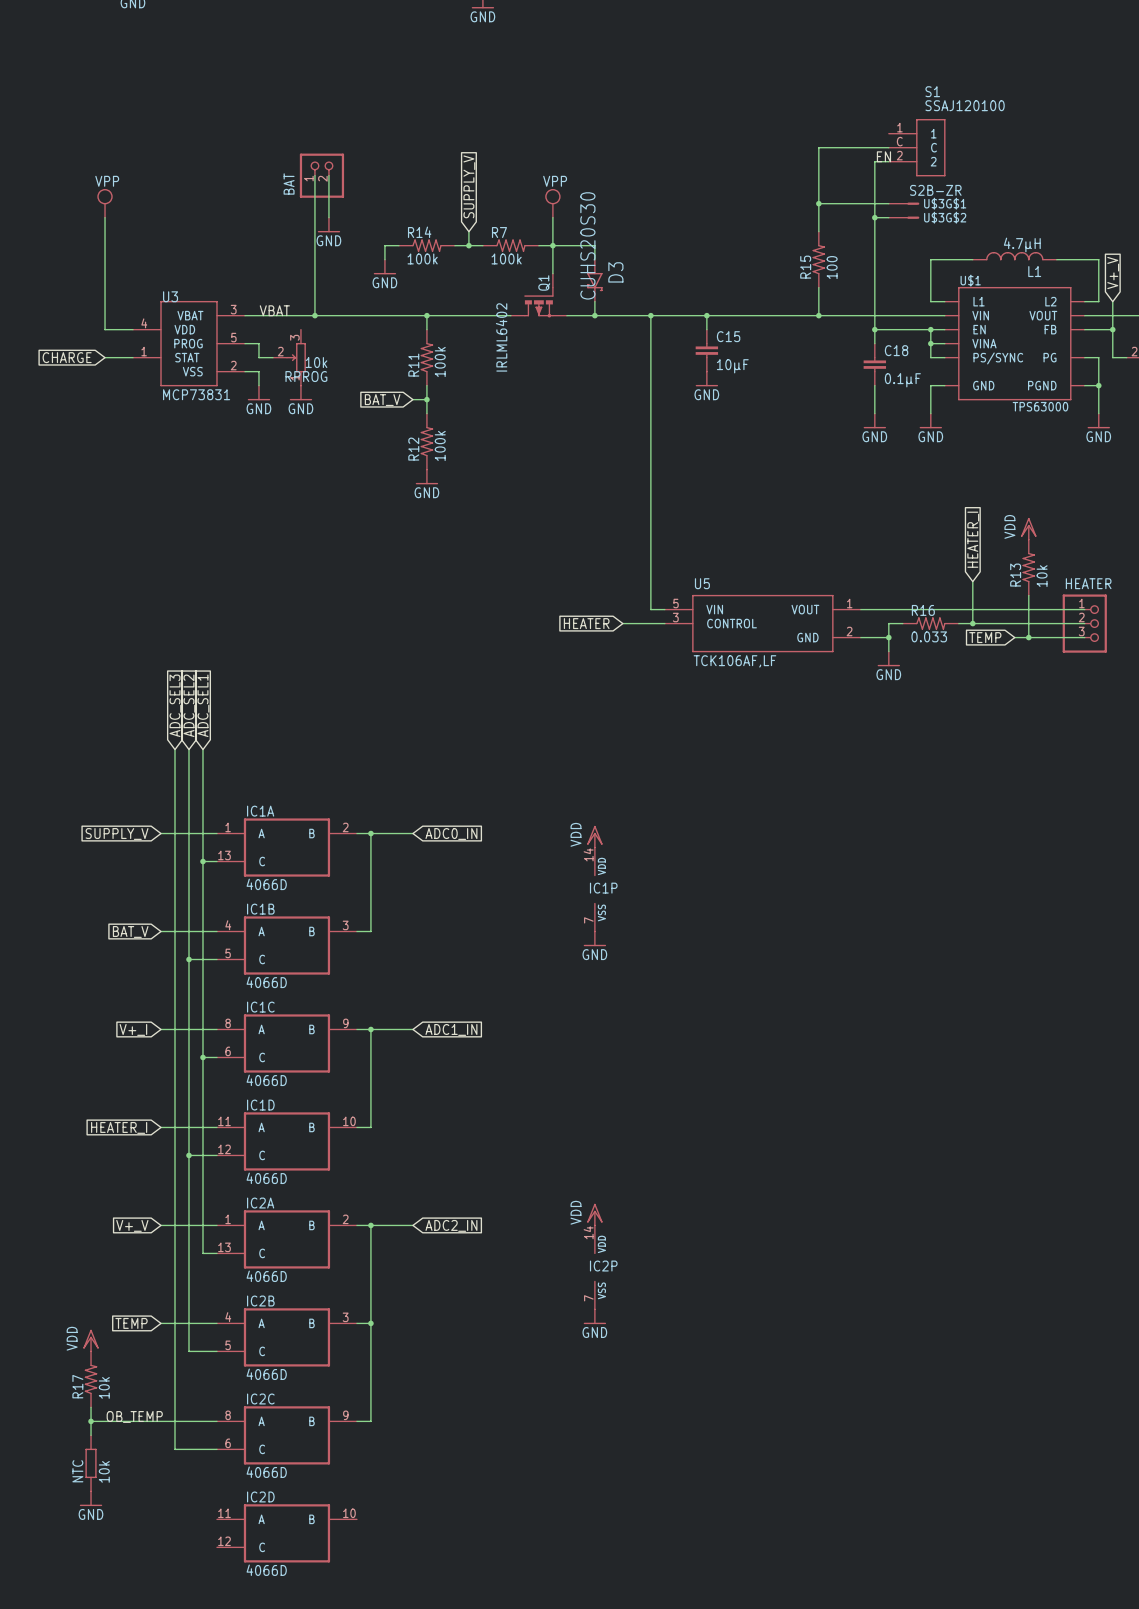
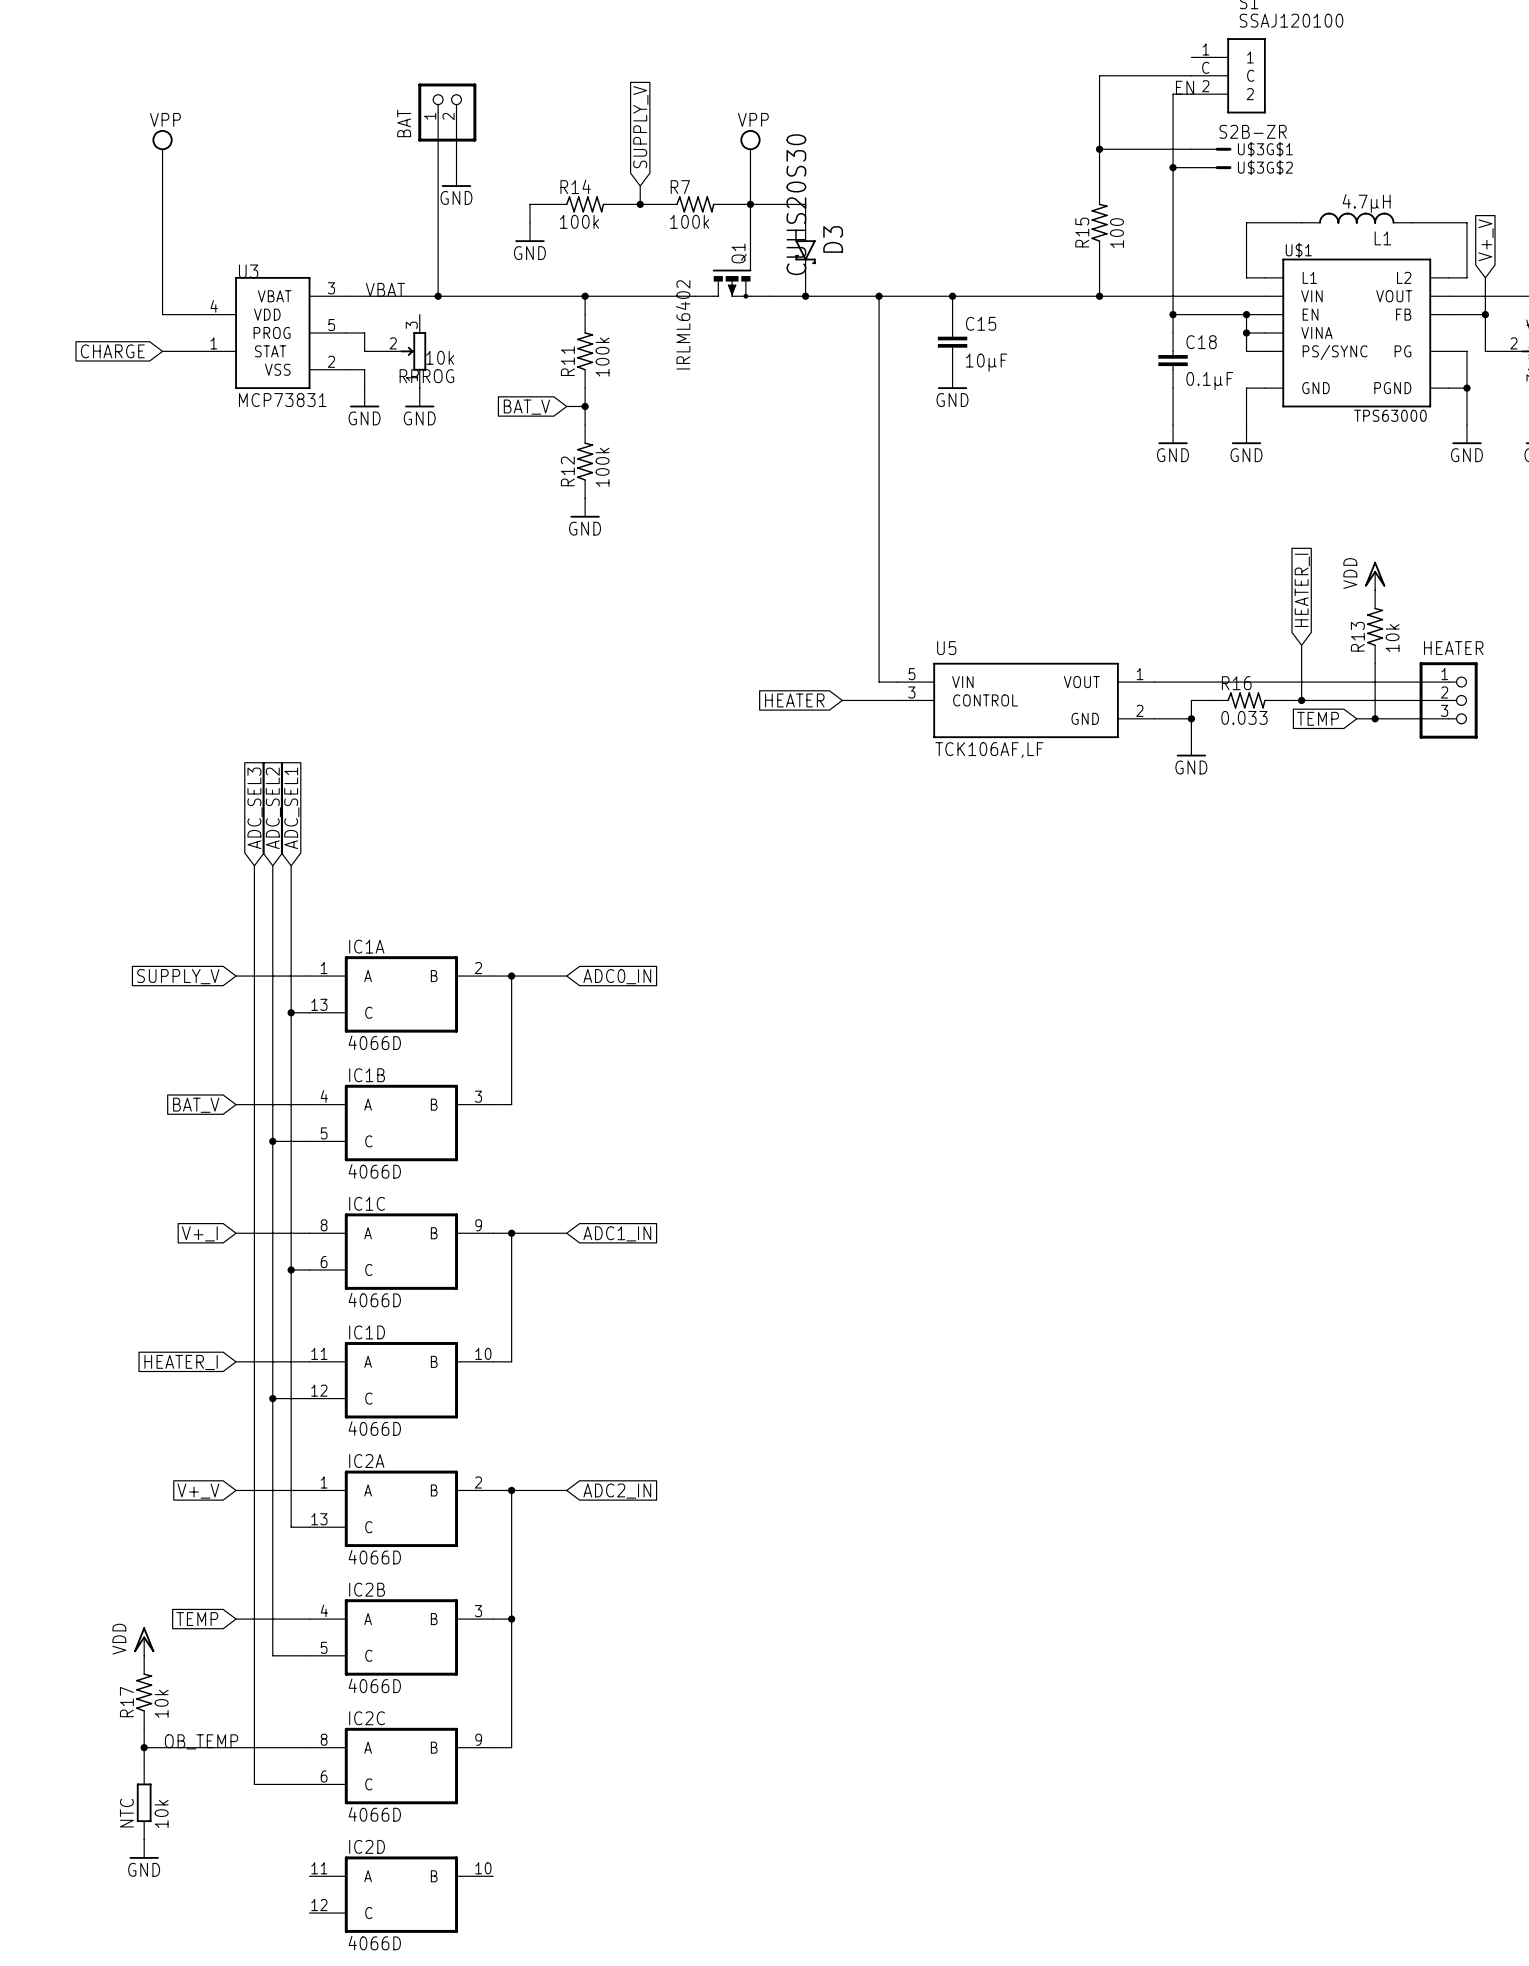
power symbol: VDD (594, 836) -> none
IC1P: (594, 889) -> none
power symbol: GND (594, 938) -> none
power symbol: VDD (594, 1214) -> none
IC2P: (594, 1267) -> none
power symbol: GND (594, 1316) -> none

